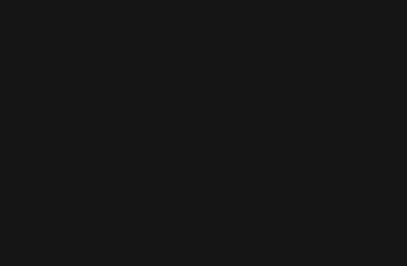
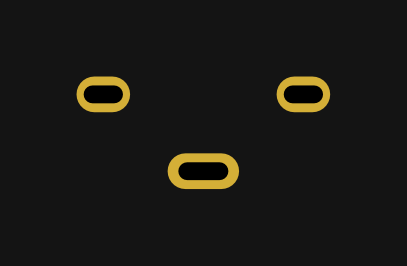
part: none -> (203, 132)

